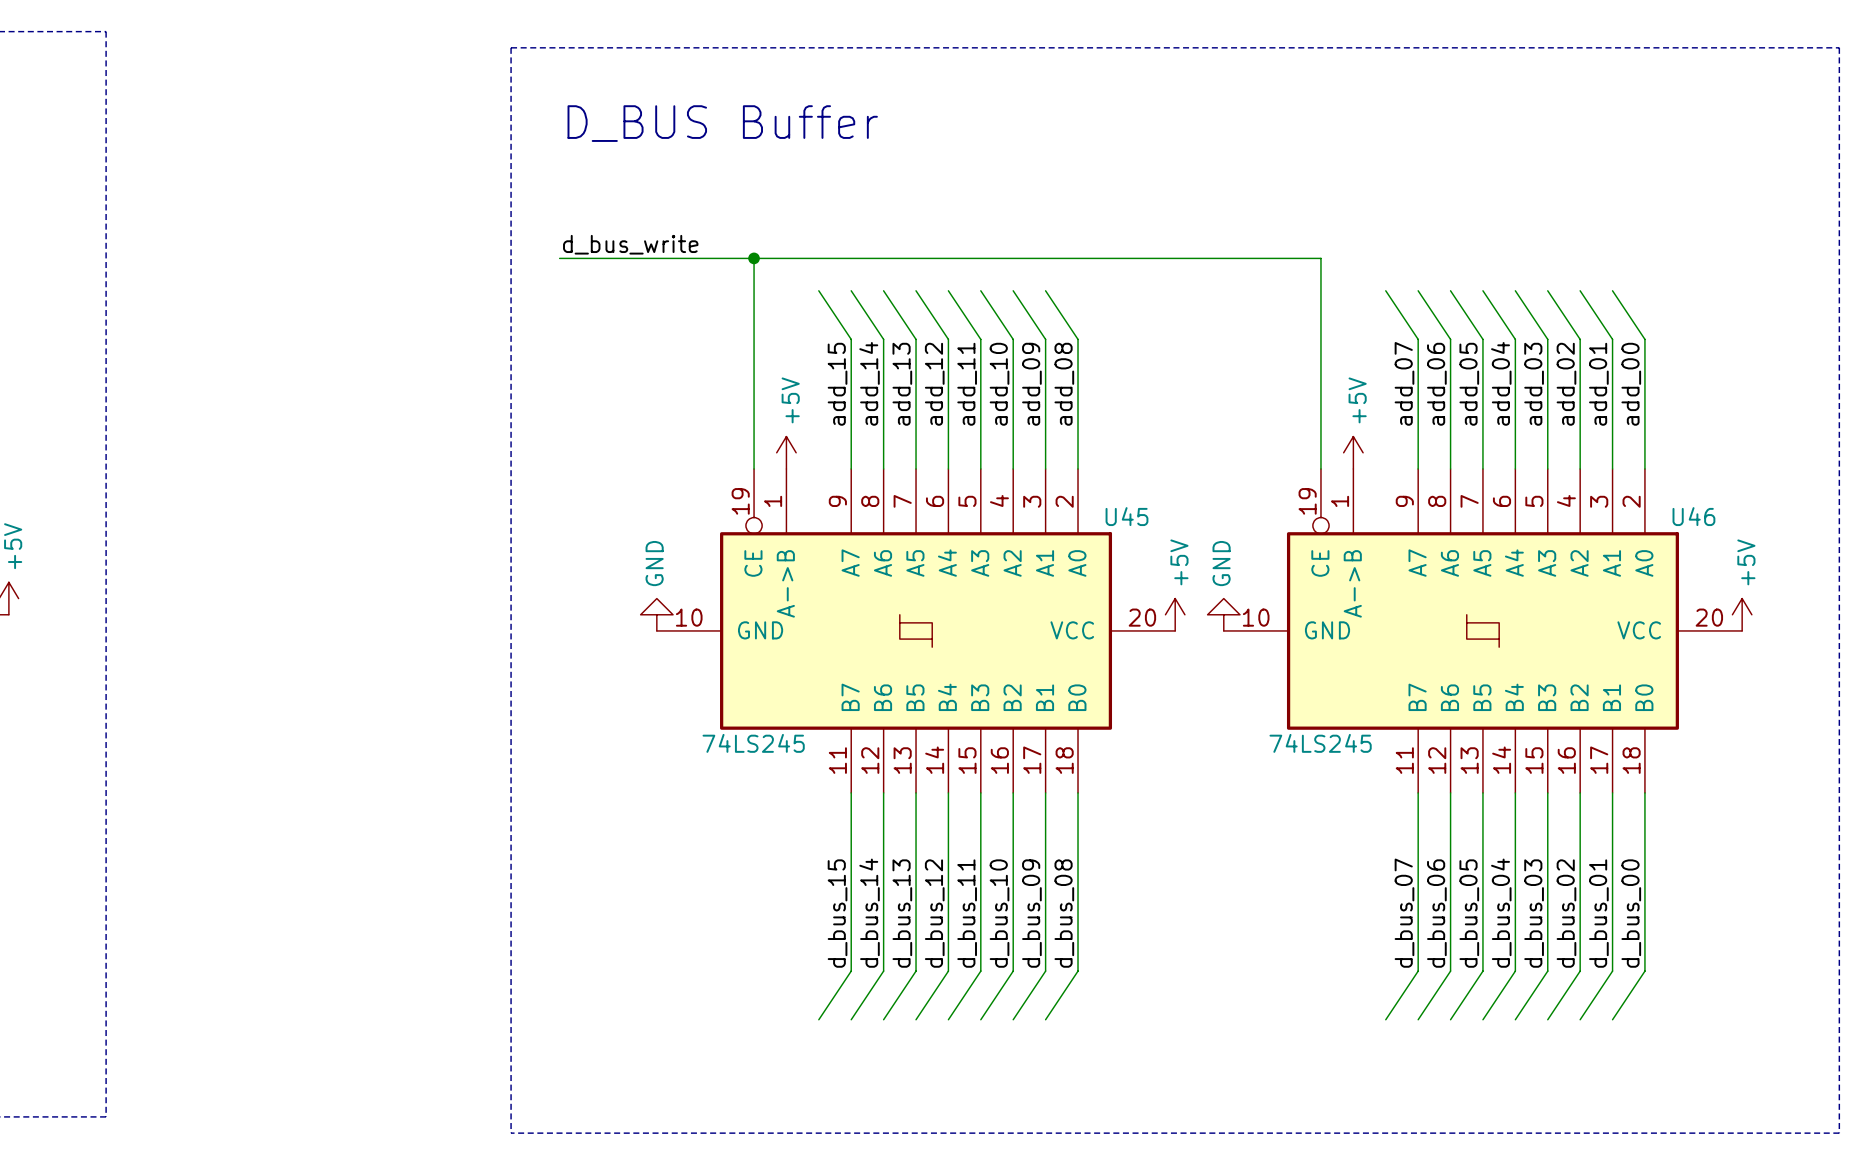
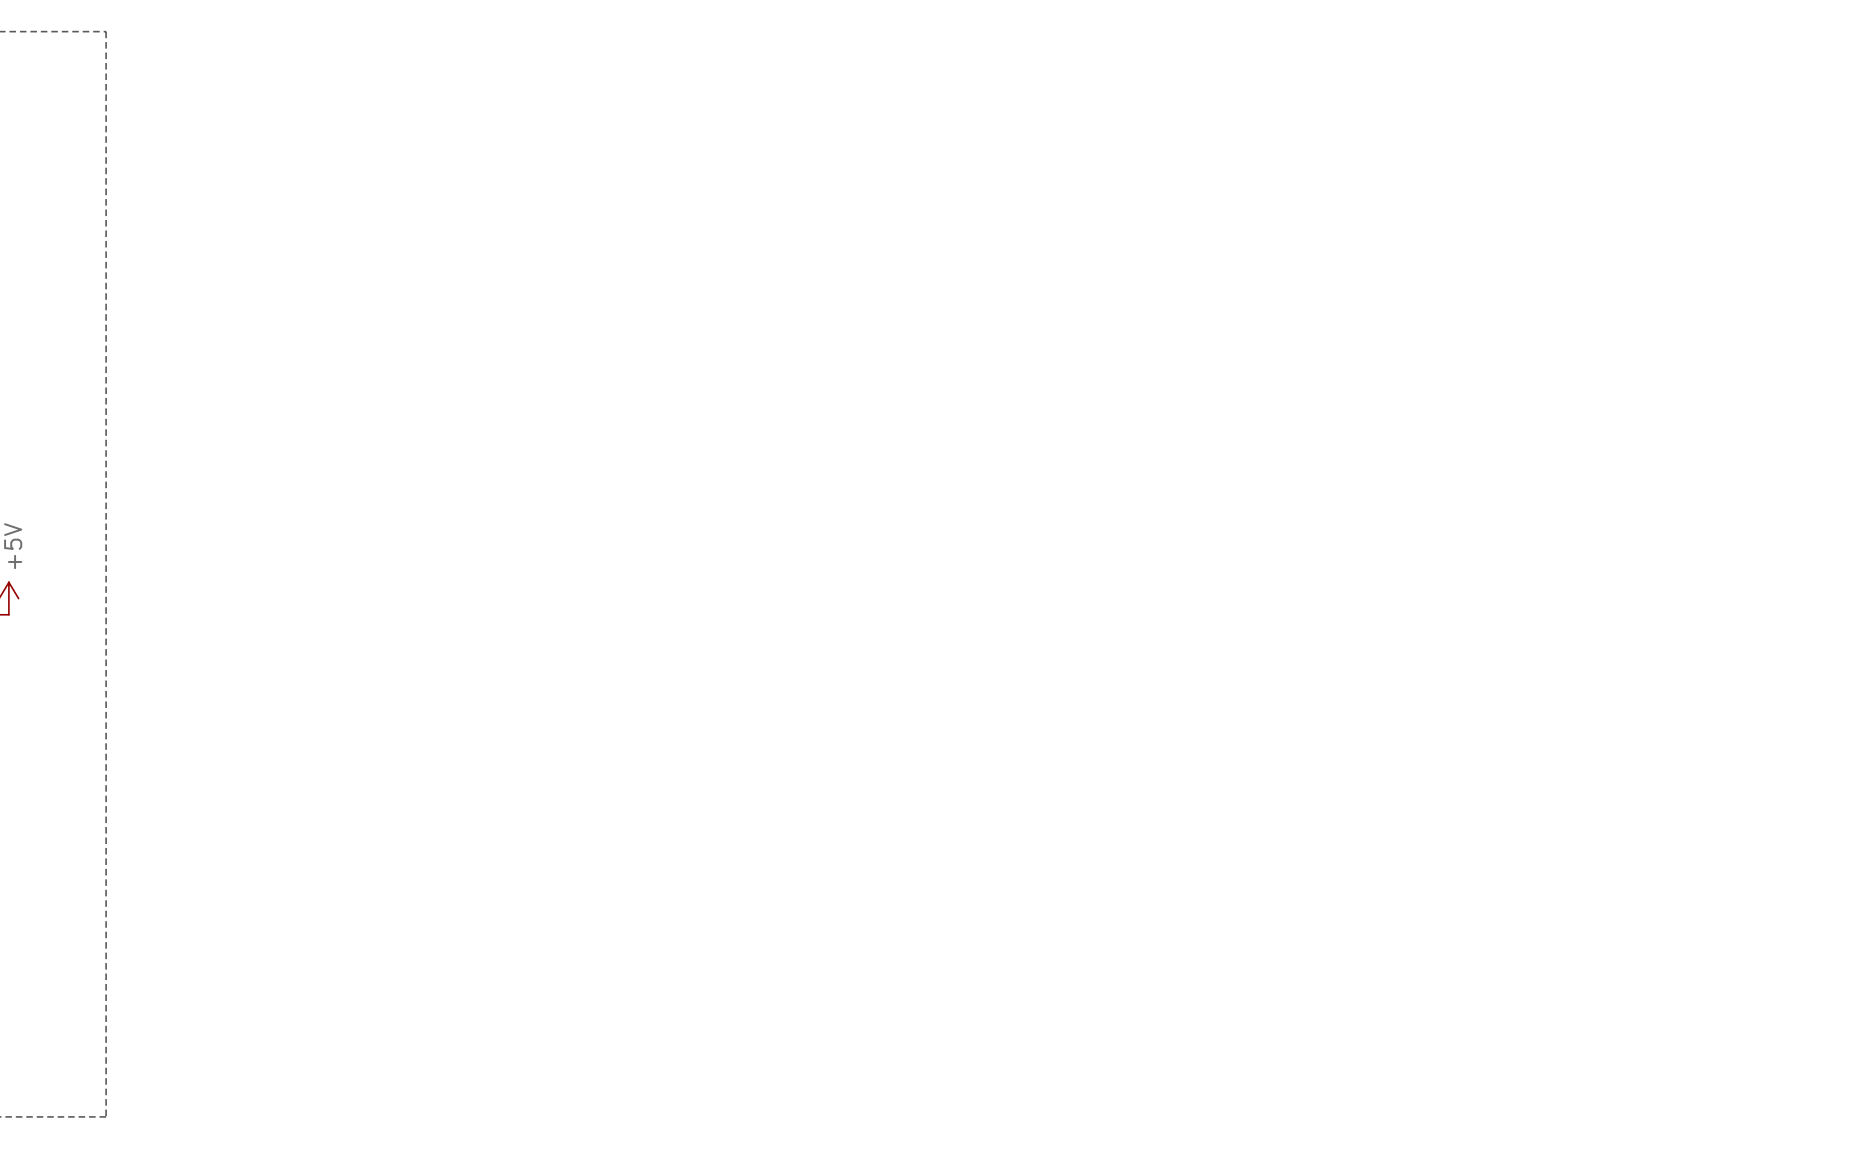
line: (511, 47) (1839, 47) (1839, 1133) (511, 1133) (511, 47) -> none
text: D_BUS Buffer (722, 123) -> none
label: d_bus_write (630, 244) -> none
wire: (559, 258) (1320, 258) (1320, 468) -> none
wire: (754, 258) (754, 468) -> none
junction: (754, 258) -> none
wire: (818, 290) (851, 339) (851, 468) -> none
wire: (851, 290) (883, 339) (883, 468) -> none
wire: (883, 290) (916, 339) (916, 468) -> none
wire: (916, 290) (948, 339) (948, 468) -> none
wire: (948, 290) (980, 339) (980, 468) -> none
wire: (980, 290) (1013, 339) (1013, 468) -> none
wire: (1013, 290) (1045, 339) (1045, 468) -> none
wire: (1045, 290) (1078, 339) (1078, 468) -> none
wire: (1385, 290) (1418, 339) (1418, 468) -> none
wire: (1418, 290) (1450, 339) (1450, 468) -> none
wire: (1450, 290) (1482, 339) (1482, 468) -> none
wire: (1482, 290) (1515, 339) (1515, 468) -> none
wire: (1515, 290) (1547, 339) (1547, 468) -> none
wire: (1547, 290) (1580, 339) (1580, 468) -> none
wire: (1580, 290) (1612, 339) (1612, 468) -> none
wire: (1612, 290) (1644, 339) (1644, 468) -> none
label: add_14 (869, 383) -> none
label: add_07 (1404, 383) -> none
label: add_04 (1501, 383) -> none
label: add_15 (837, 384) -> none
label: add_13 (902, 384) -> none
label: add_12 (934, 384) -> none
label: add_11 (967, 384) -> none
label: add_10 (999, 384) -> none
label: add_09 (1031, 384) -> none
label: add_08 (1064, 384) -> none
label: add_06 (1436, 384) -> none
label: add_05 (1469, 384) -> none
label: add_03 (1534, 384) -> none
label: add_02 (1566, 384) -> none
label: add_01 (1598, 384) -> none
label: add_00 (1631, 384) -> none
power symbol: +5V (786, 452) -> none
power symbol: +5V (1353, 452) -> none
power symbol: GND (656, 614) -> none
power symbol: +5V (1175, 614) -> none
power symbol: GND (1223, 614) -> none
power symbol: +5V (1742, 614) -> none
U45: 74LS245 (916, 630) -> none
U46: 74LS245 (1482, 630) -> none
wire: (851, 792) (851, 971) (818, 1019) -> none
wire: (883, 792) (883, 971) (851, 1019) -> none
wire: (916, 792) (916, 971) (883, 1019) -> none
wire: (948, 792) (948, 971) (916, 1019) -> none
wire: (980, 792) (980, 971) (948, 1019) -> none
wire: (1013, 792) (1013, 971) (980, 1019) -> none
wire: (1045, 792) (1045, 971) (1013, 1019) -> none
wire: (1078, 792) (1078, 971) (1045, 1019) -> none
wire: (1418, 792) (1418, 971) (1385, 1019) -> none
wire: (1450, 792) (1450, 971) (1418, 1019) -> none
wire: (1482, 792) (1482, 971) (1450, 1019) -> none
wire: (1515, 792) (1515, 971) (1482, 1019) -> none
wire: (1547, 792) (1547, 971) (1515, 1019) -> none
wire: (1580, 792) (1580, 971) (1547, 1019) -> none
wire: (1612, 792) (1612, 971) (1580, 1019) -> none
wire: (1644, 792) (1644, 971) (1612, 1019) -> none
label: d_bus_15 (837, 913) -> none
label: d_bus_14 (869, 913) -> none
label: d_bus_13 (902, 913) -> none
label: d_bus_12 (934, 913) -> none
label: d_bus_11 (967, 913) -> none
label: d_bus_10 (999, 913) -> none
label: d_bus_09 (1031, 913) -> none
label: d_bus_08 (1064, 913) -> none
label: d_bus_07 (1404, 913) -> none
label: d_bus_06 (1436, 913) -> none
label: d_bus_05 (1469, 913) -> none
label: d_bus_04 (1501, 913) -> none
label: d_bus_03 (1534, 913) -> none
label: d_bus_02 (1566, 913) -> none
label: d_bus_01 (1598, 913) -> none
label: d_bus_00 (1631, 913) -> none

